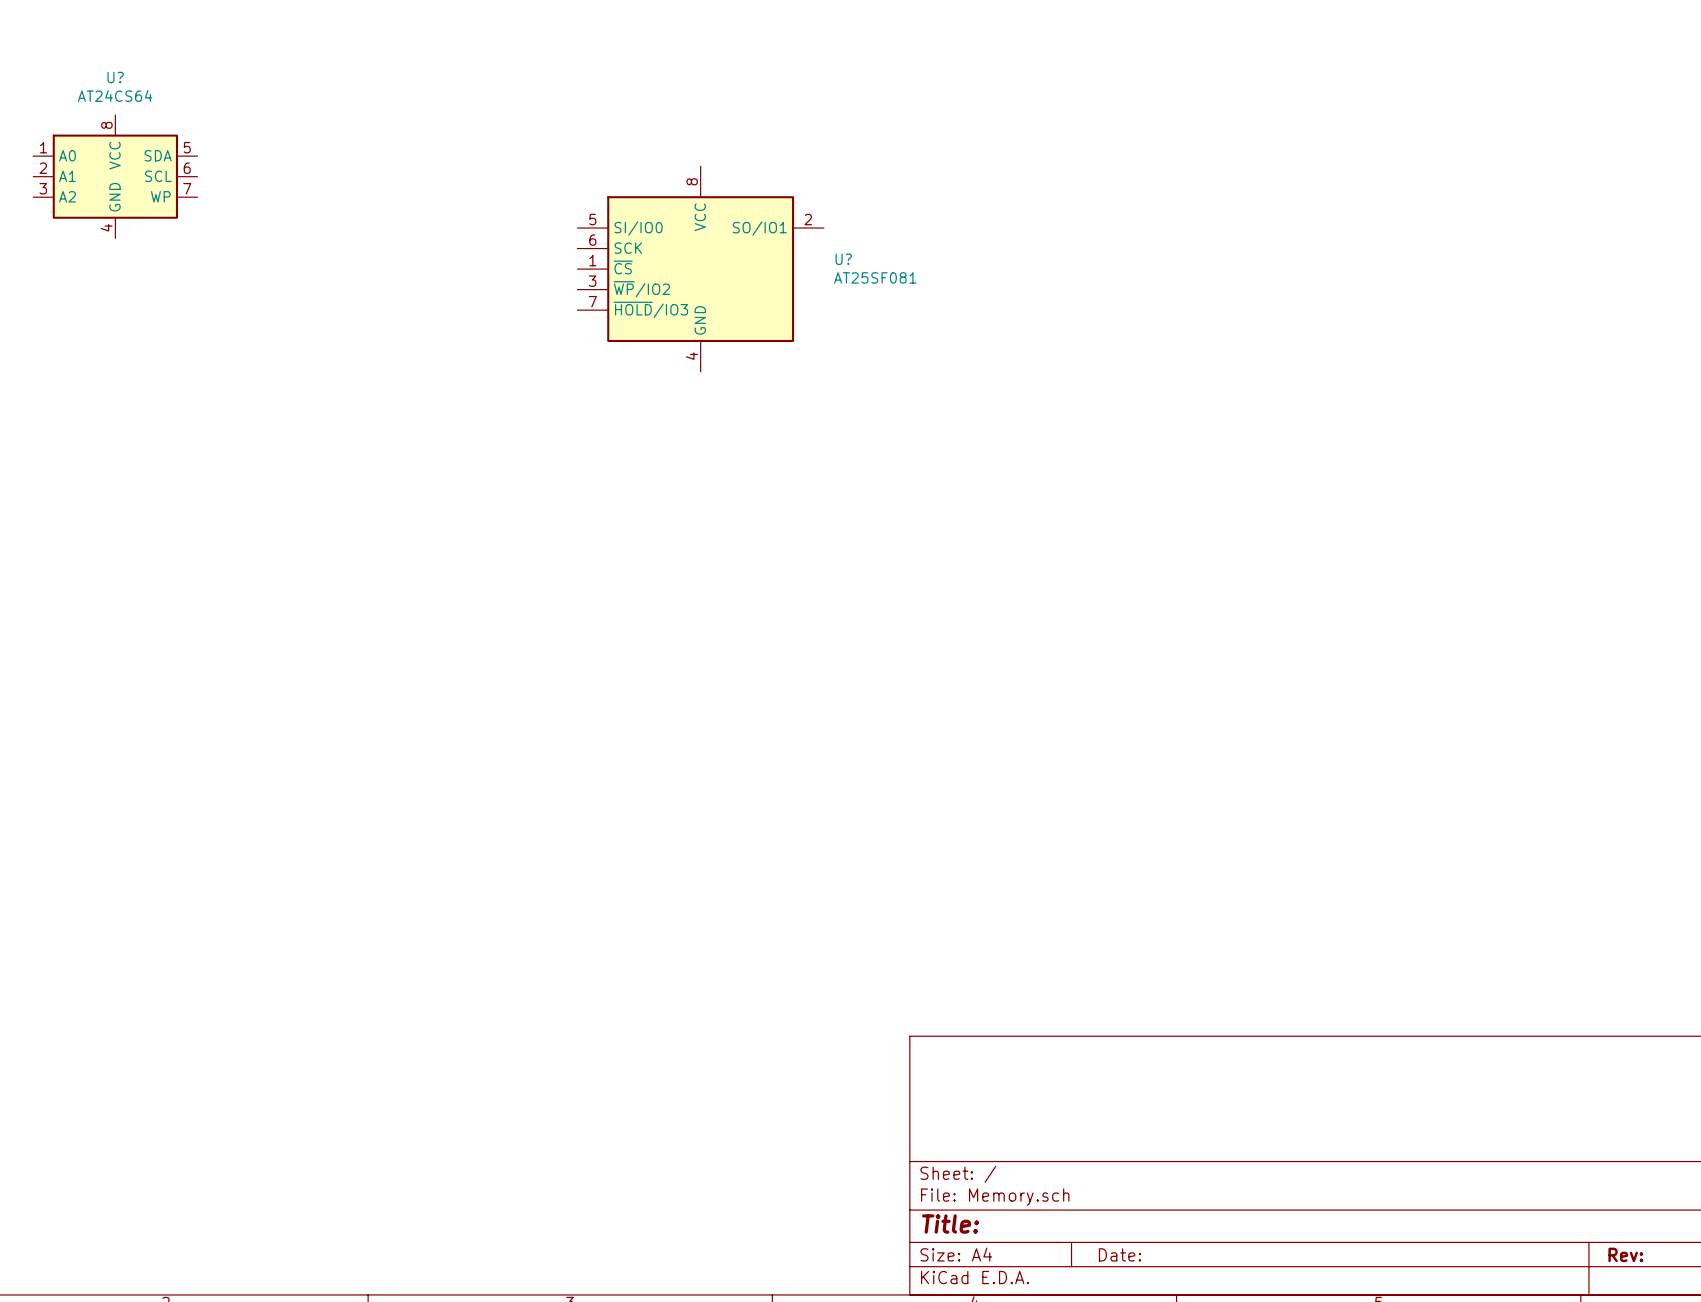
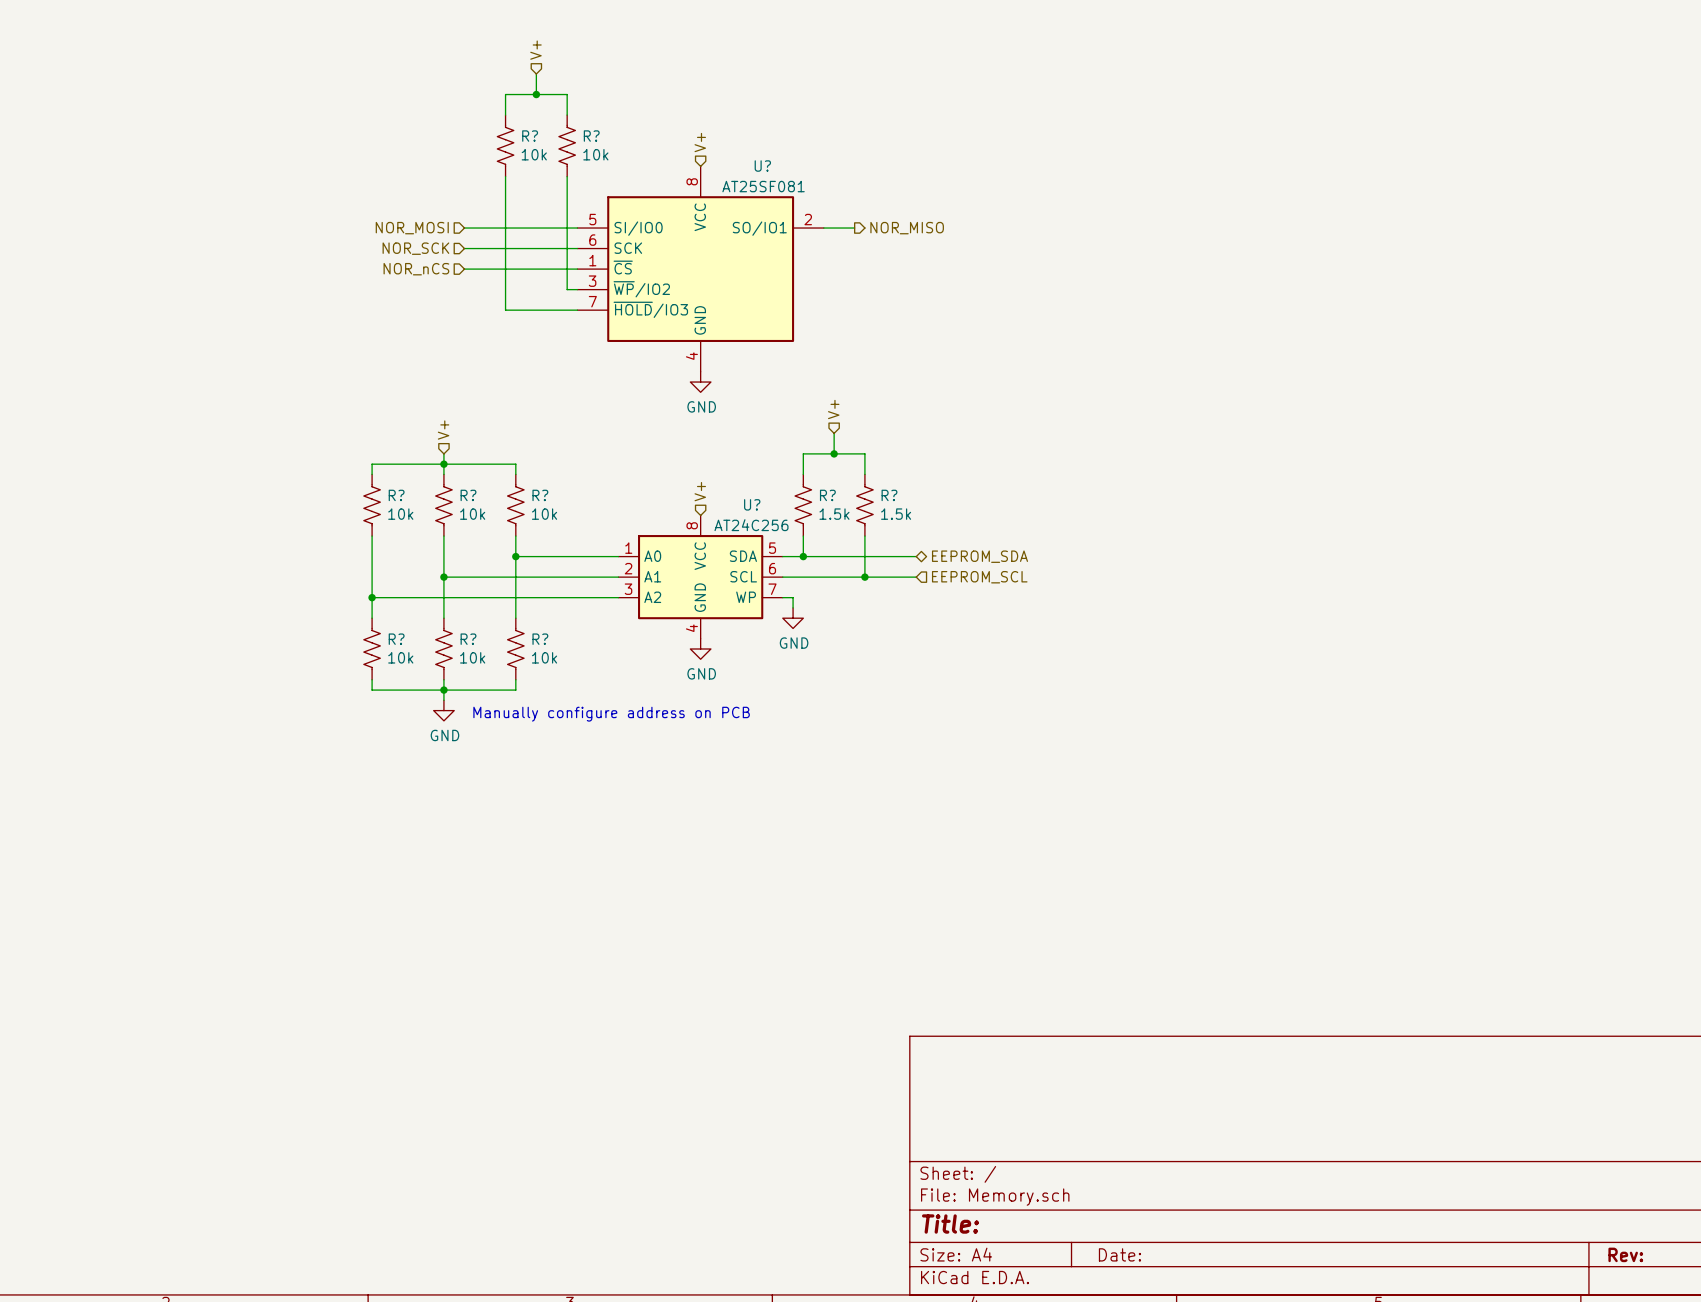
hierarchical label: none -> V+ (535, 50)
wire: none -> (536, 73) (536, 94)
junction: none -> (536, 94)
wire: none -> (505, 115) (505, 94) (567, 94) (567, 115)
hierarchical label: none -> V+ (700, 142)
R?: none -> 10k (505, 145)
R?: none -> 10k (567, 145)
U?: AT24CS64 (115, 176) -> none
wire: none -> (505, 176) (505, 310) (577, 310)
wire: none -> (567, 176) (567, 289) (577, 289)
hierarchical label: none -> NOR_MOSI (412, 228)
wire: none -> (464, 228) (577, 228)
wire: none -> (823, 228) (854, 228)
hierarchical label: none -> NOR_MISO (907, 228)
hierarchical label: none -> NOR_SCK (415, 248)
wire: none -> (464, 248) (577, 248)
U? name position: U? (843, 259) -> U? (762, 166)
hierarchical label: none -> NOR_nCS (416, 269)
wire: none -> (464, 269) (577, 269)
U? value position: AT25SF081 (875, 277) -> AT25SF081 (763, 186)
power symbol: none -> GND (700, 382)
hierarchical label: none -> V+ (833, 409)
hierarchical label: none -> V+ (443, 430)
wire: none -> (834, 433) (834, 453)
wire: none -> (443, 453) (443, 474)
junction: none -> (834, 453)
junction: none -> (443, 464)
wire: none -> (372, 474) (372, 464) (515, 464) (515, 474)
wire: none -> (803, 474) (803, 453) (864, 453) (864, 474)
hierarchical label: none -> V+ (700, 491)
R?: none -> 10k (372, 505)
R?: none -> 10k (443, 505)
R?: none -> 10k (515, 505)
R?: none -> 1.5k (803, 505)
R?: none -> 1.5k (864, 505)
wire: none -> (372, 536) (372, 618)
wire: none -> (443, 536) (443, 618)
wire: none -> (515, 536) (515, 618)
wire: none -> (803, 536) (803, 556)
wire: none -> (864, 536) (864, 577)
wire: none -> (515, 556) (618, 556)
junction: none -> (515, 556)
wire: none -> (782, 556) (916, 556)
junction: none -> (803, 556)
hierarchical label: none -> EEPROM_SDA (979, 556)
wire: none -> (443, 577) (618, 577)
junction: none -> (443, 577)
U?: none -> AT24C256 (700, 577)
wire: none -> (782, 577) (916, 577)
junction: none -> (864, 577)
hierarchical label: none -> EEPROM_SCL (979, 577)
wire: none -> (372, 597) (618, 597)
junction: none -> (372, 597)
wire: none -> (782, 597) (793, 597) (793, 607)
power symbol: none -> GND (793, 618)
R?: none -> 10k (372, 649)
R?: none -> 10k (443, 649)
R?: none -> 10k (515, 649)
power symbol: none -> GND (700, 649)
wire: none -> (372, 679) (372, 690) (515, 690) (515, 679)
wire: none -> (443, 679) (443, 700)
junction: none -> (443, 690)
power symbol: none -> GND (443, 710)
text: none -> Manually configure address on PCB (611, 714)

